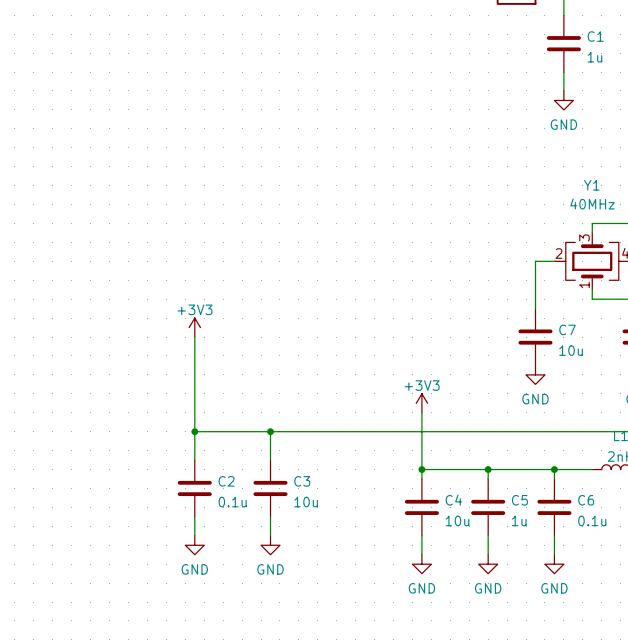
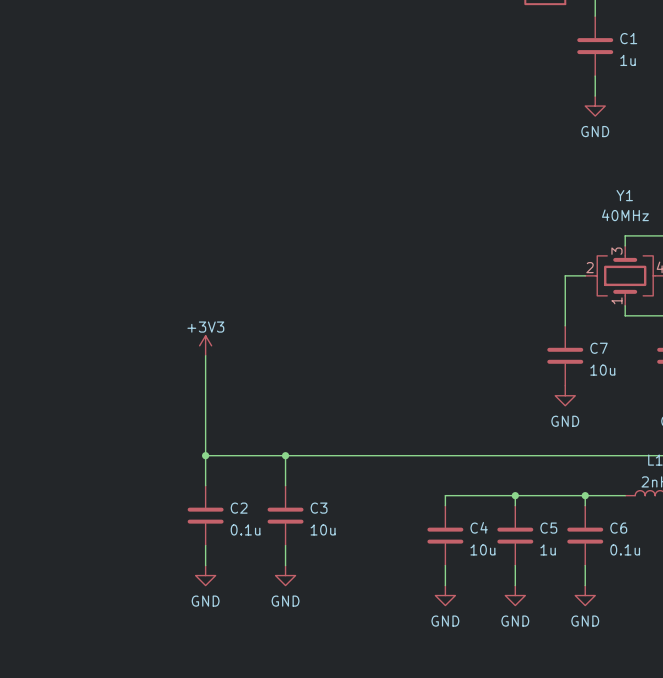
power symbol: +3V3 (421, 403) -> none
wire: (421, 412) (421, 469) -> none
junction: (421, 469) -> none

